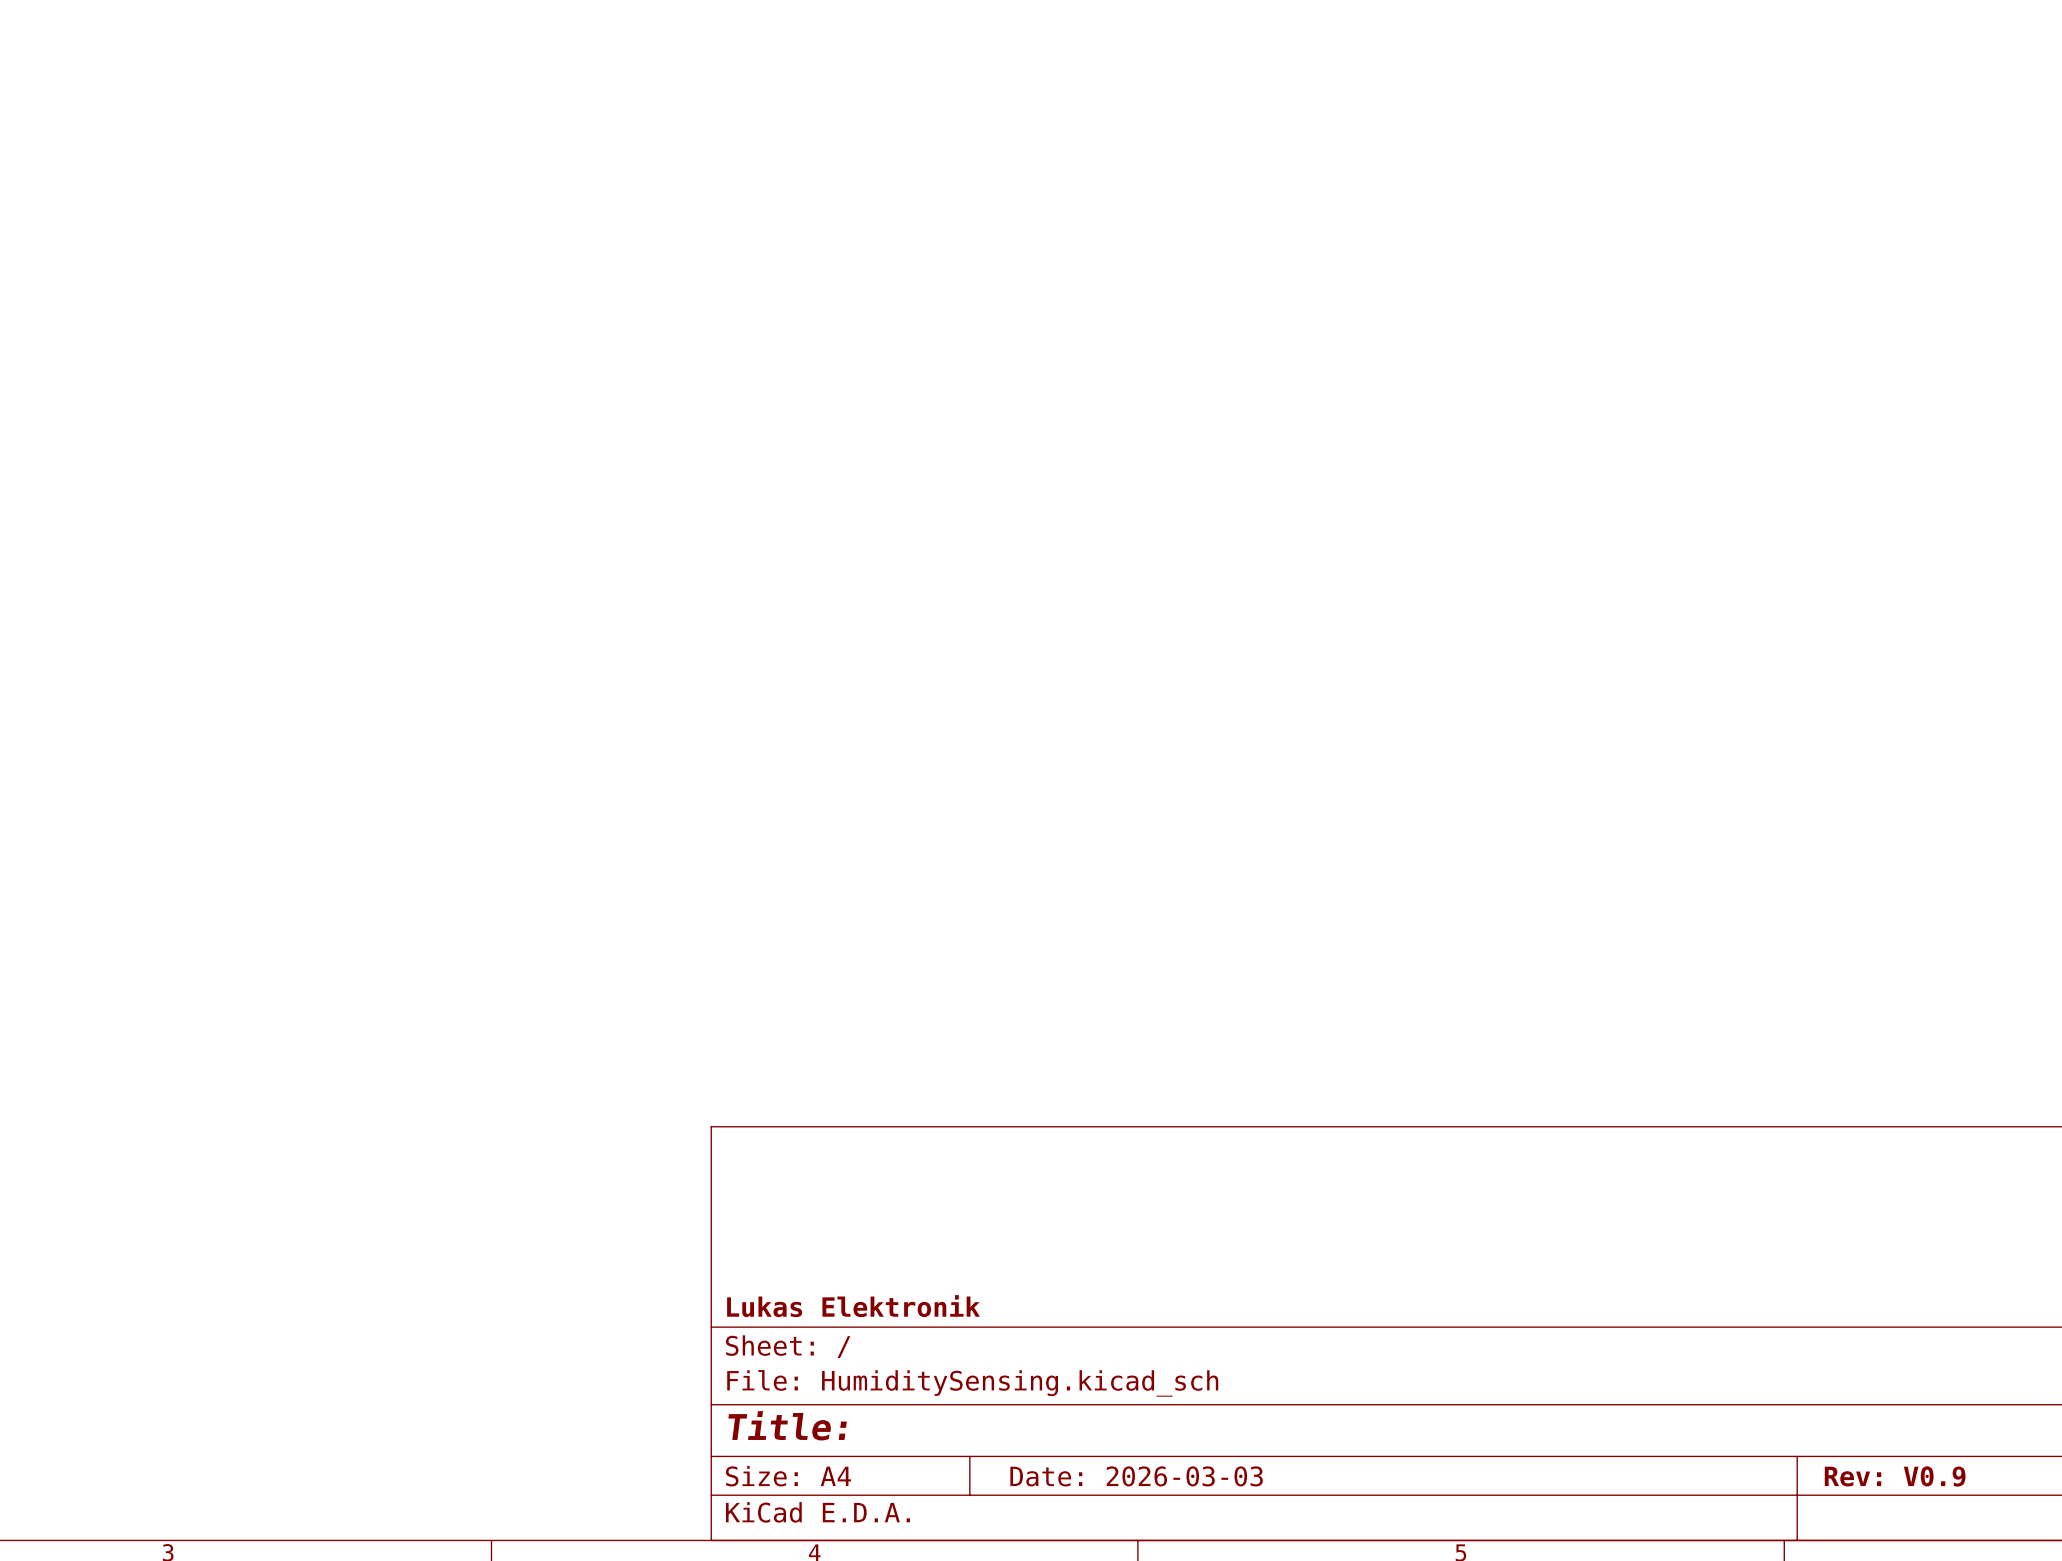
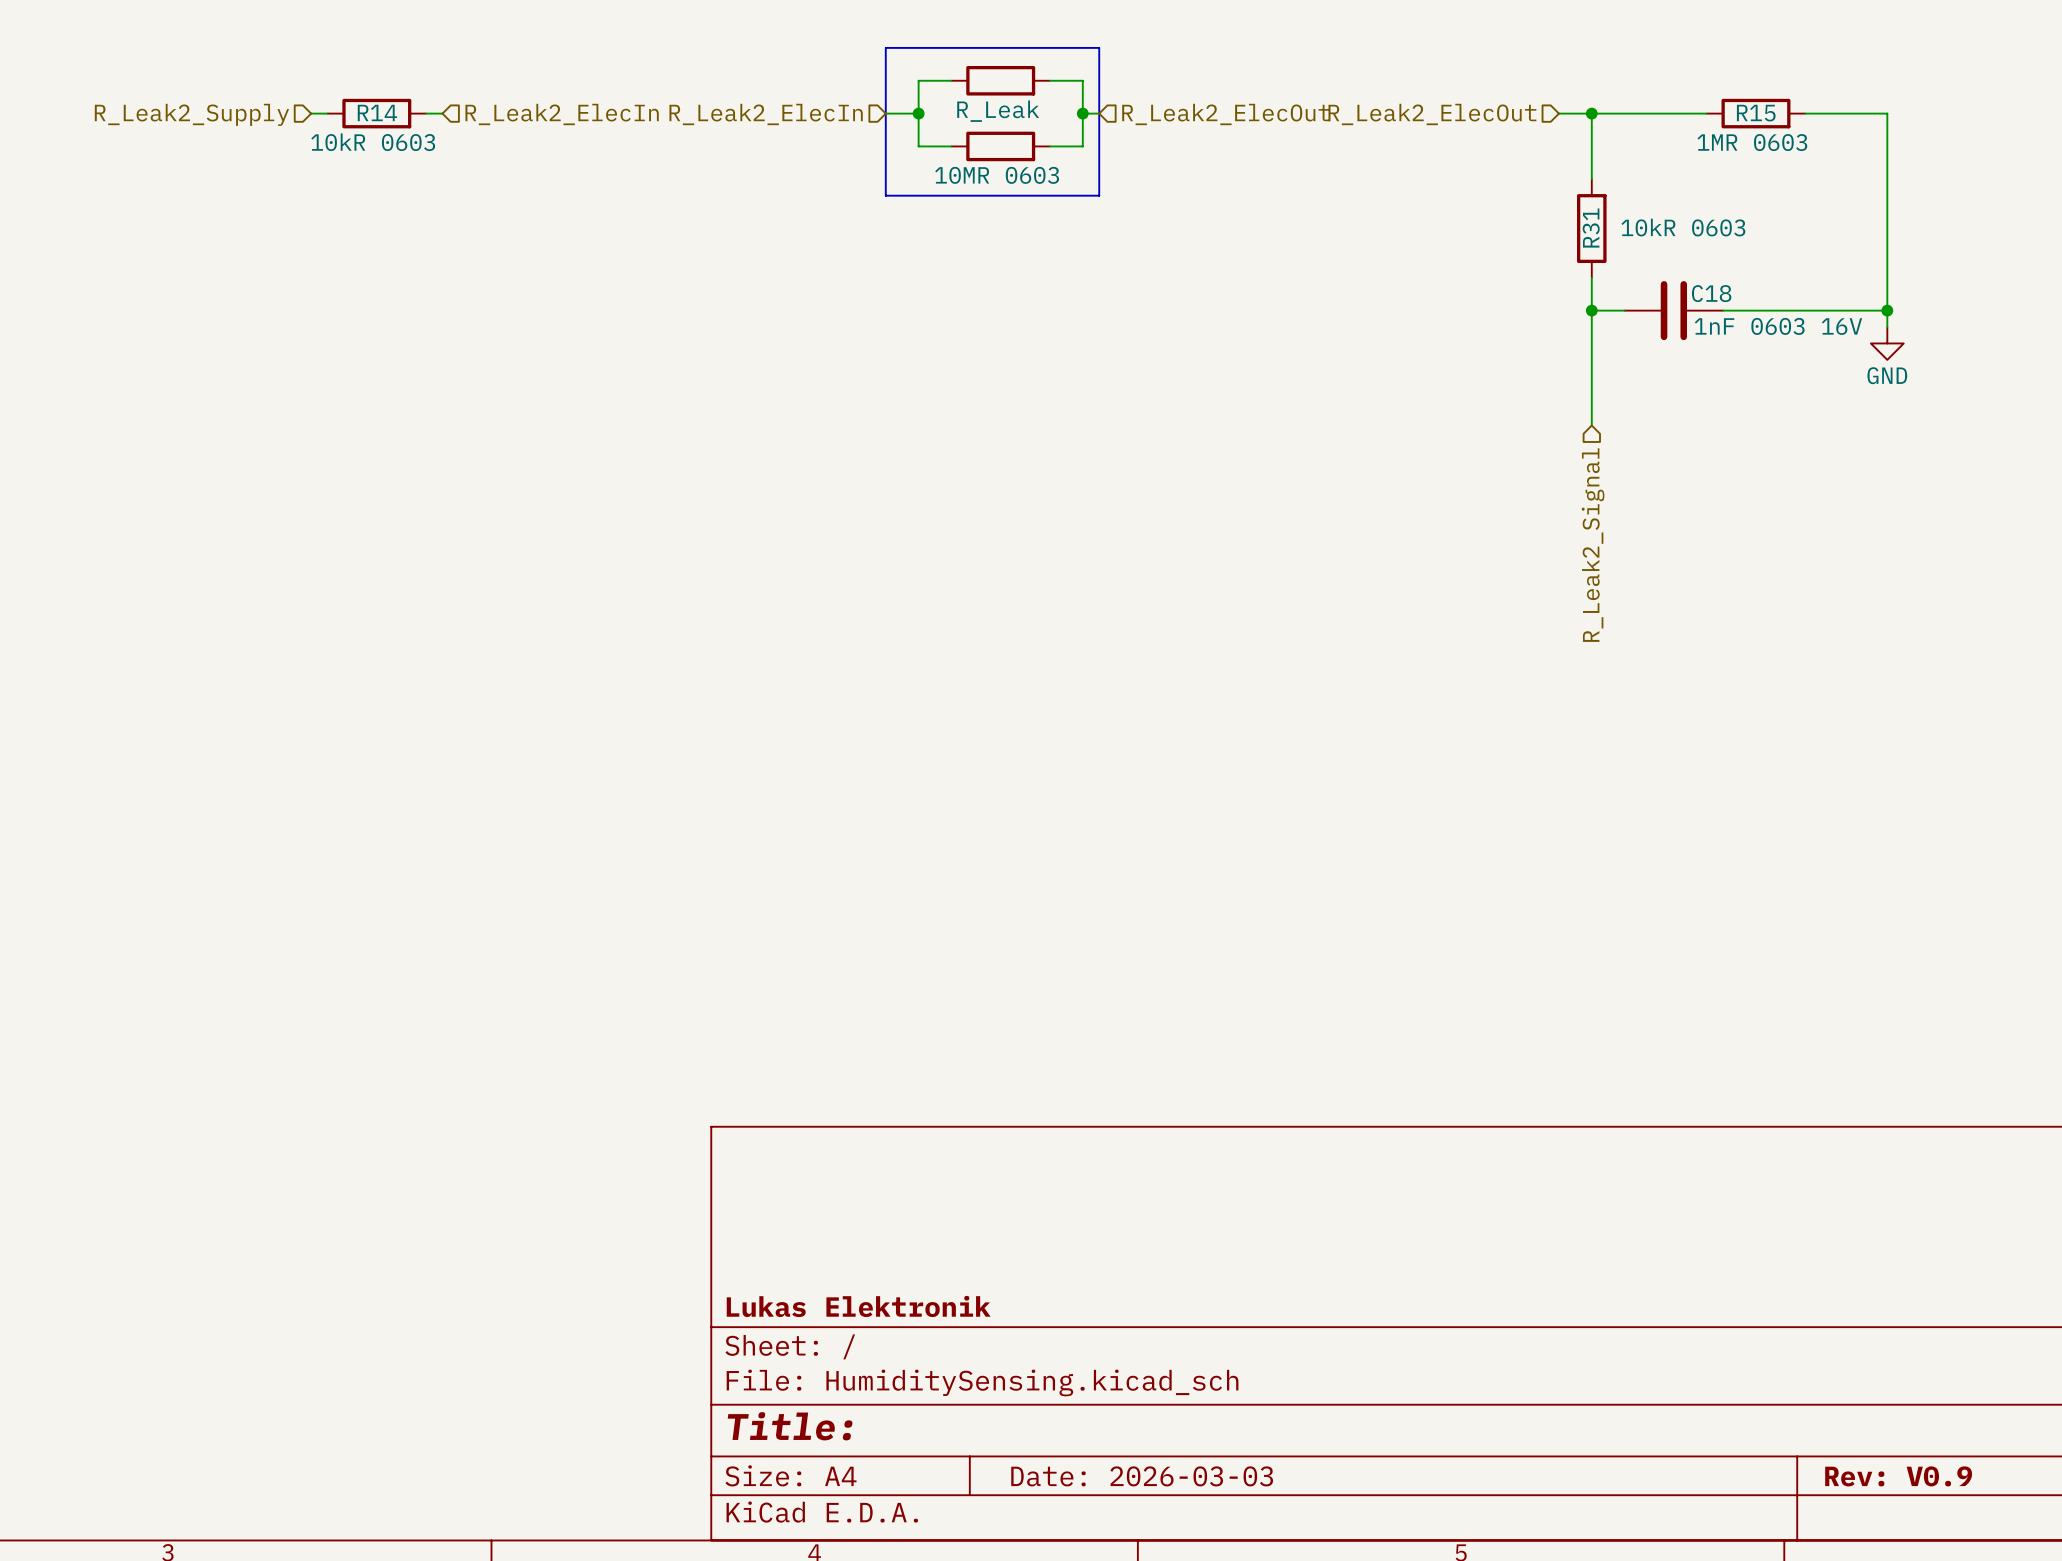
line: none -> (885, 47) (1099, 47) (1099, 195) (885, 195) (885, 47)
wire: none -> (951, 80) (918, 80) (918, 146) (951, 146)
part: none -> R_Leak (1000, 80)
wire: none -> (1049, 80) (1082, 80) (1082, 146) (1049, 146)
wire: none -> (311, 113) (327, 113)
R14: none -> 10kR 0603 (376, 113)
wire: none -> (426, 113) (442, 113)
wire: none -> (885, 113) (918, 113)
junction: none -> (918, 113)
wire: none -> (1082, 113) (1099, 113)
junction: none -> (1082, 113)
wire: none -> (1558, 113) (1706, 113)
wire: none -> (1591, 113) (1591, 179)
junction: none -> (1591, 113)
R15: none -> 1MR 0603 (1755, 113)
wire: none -> (1805, 113) (1887, 113) (1887, 327)
hierarchical label: none -> R_Leak2_Supply (191, 114)
hierarchical label: none -> R_Leak2_ElecIn (562, 114)
hierarchical label: none -> R_Leak2_ElecIn (766, 114)
hierarchical label: none -> R_Leak2_ElecOut (1226, 114)
hierarchical label: none -> R_Leak2_ElecOut (1432, 114)
part: none -> 10MR 0603 (1000, 146)
R31: none -> 10kR 0603 (1591, 228)
wire: none -> (1591, 277) (1591, 425)
wire: none -> (1591, 310) (1624, 310)
junction: none -> (1591, 310)
C18: none -> 1nF 0603 16V (1673, 310)
wire: none -> (1723, 310) (1887, 310)
junction: none -> (1887, 310)
power symbol: none -> GND (1887, 343)
hierarchical label: none -> R_Leak2_Signal (1593, 545)

